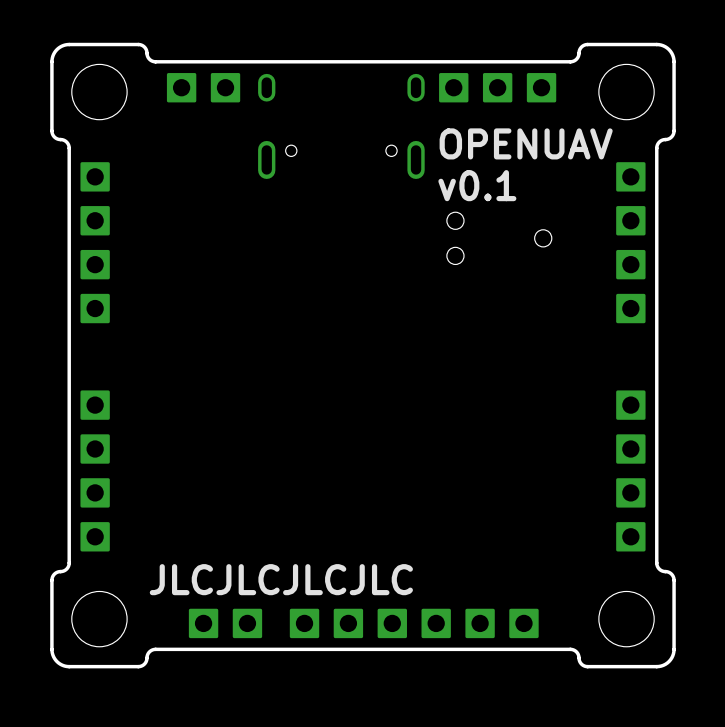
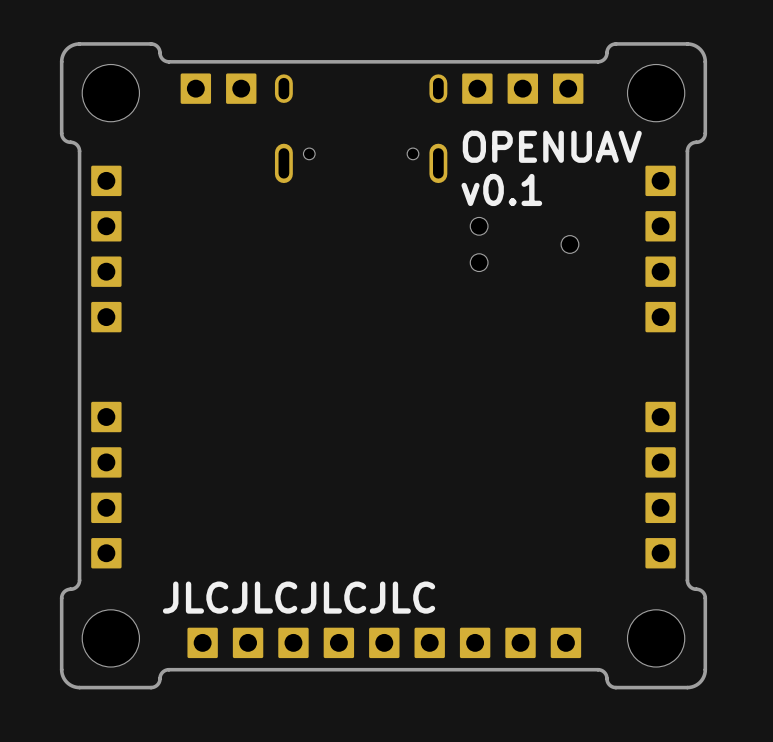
part: none -> (202, 642)
part: (203, 623) -> none
part: none -> (248, 642)
part: (247, 623) -> none
part: none -> (293, 642)
part: (304, 623) -> none
part: none -> (338, 642)
part: (348, 623) -> none
part: none -> (384, 642)
part: (392, 623) -> none
part: none -> (429, 642)
part: (436, 623) -> none
part: none -> (475, 642)
part: (480, 623) -> none
part: none -> (520, 642)
part: (523, 623) -> none
part: none -> (565, 642)

